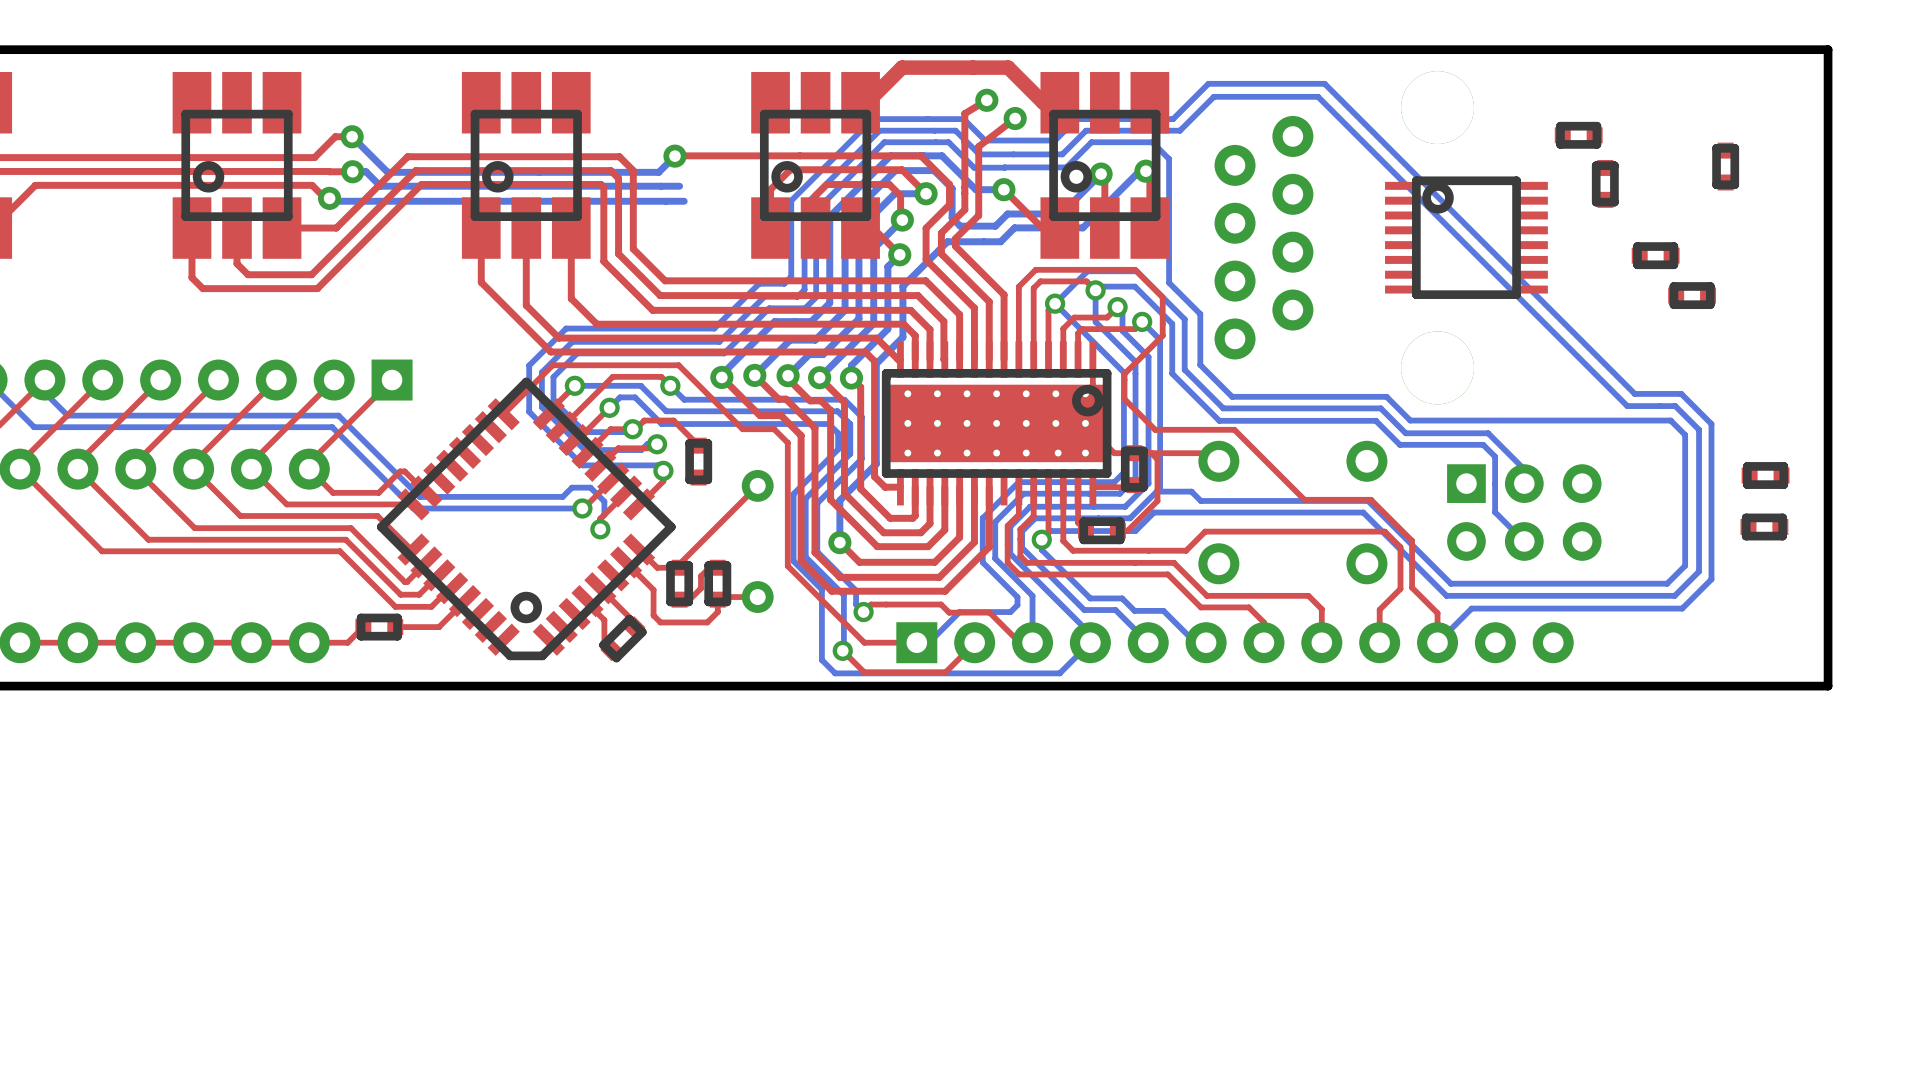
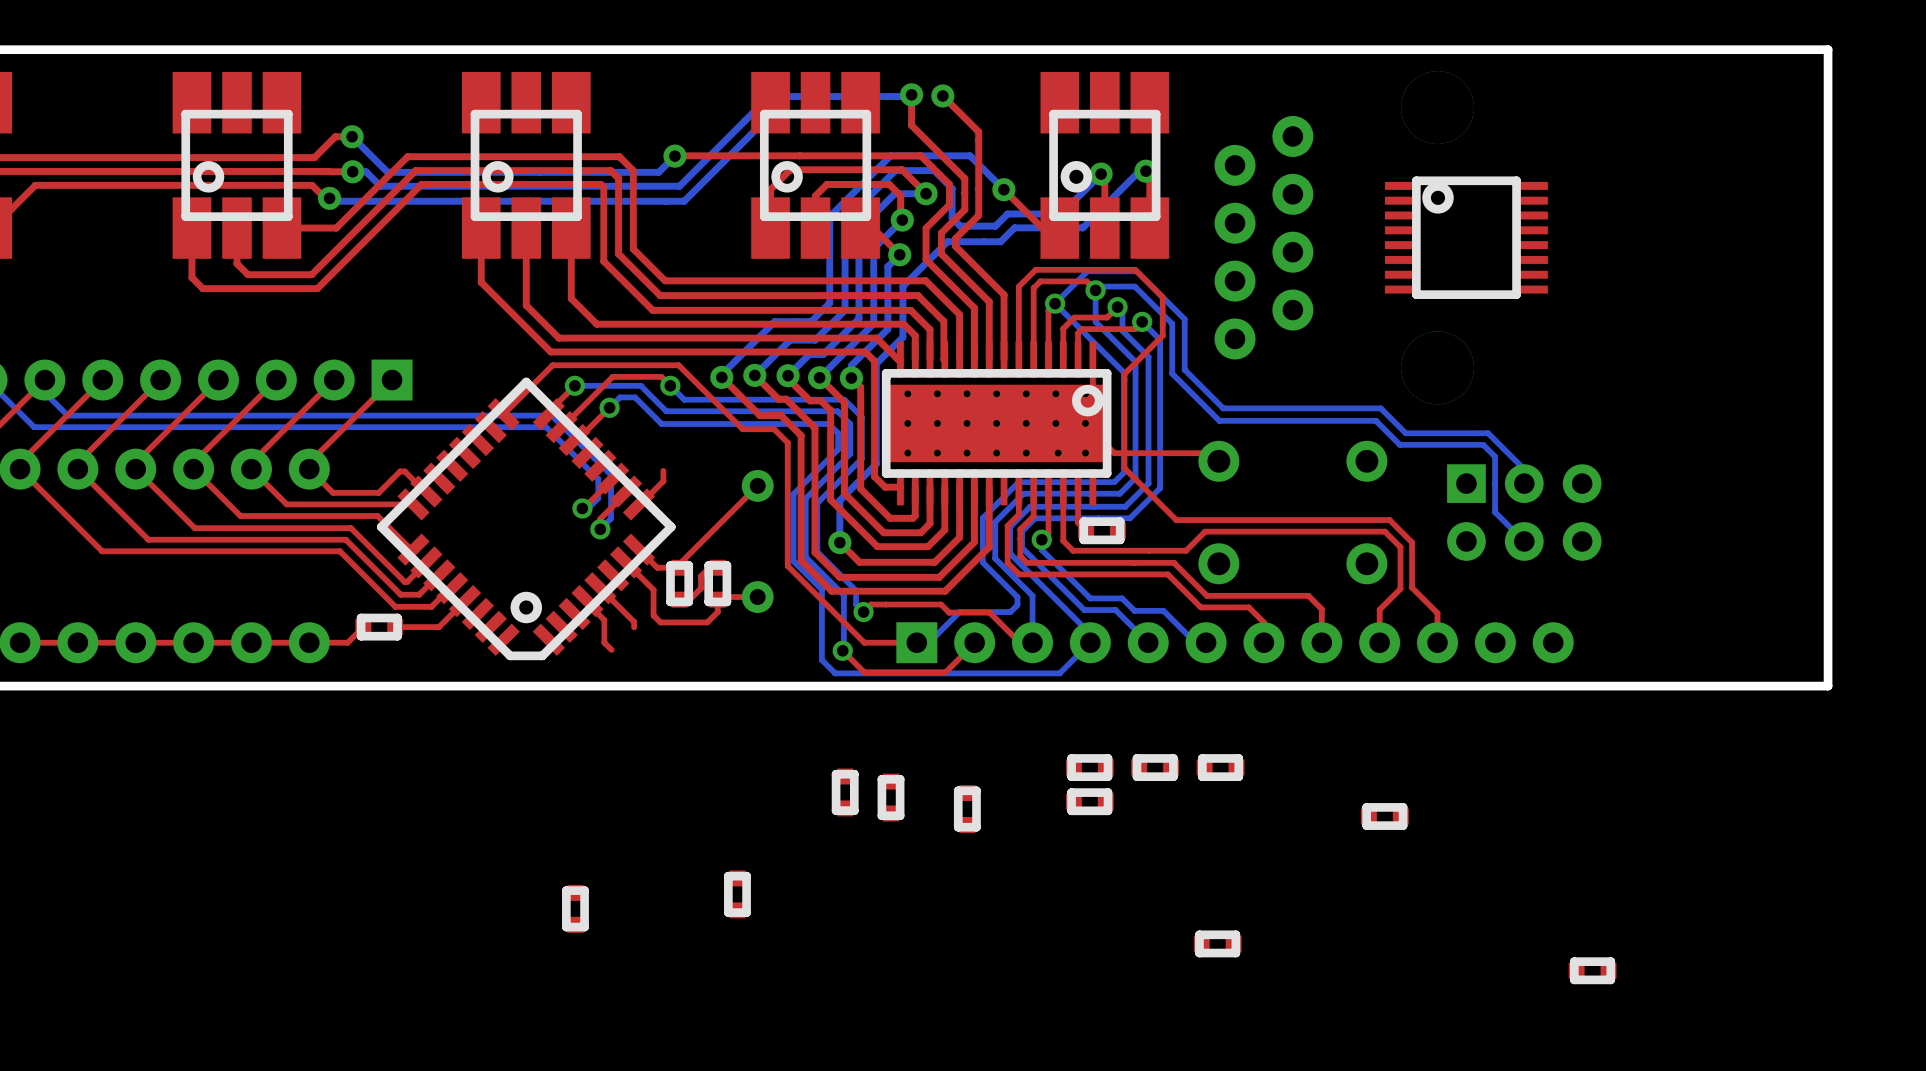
bottom track: none -> (911, 94) (909, 96) (769, 96) (679, 186)
via: none -> (911, 94)
via: none -> (942, 95)
top track: (986, 100) (964, 113) (964, 178) -> (911, 94) (911, 125) (964, 178)
via: (986, 100) -> none
top track: (860, 102) (866, 102) (902, 67) (1008, 67) (1043, 102) (1059, 102) -> none
bottom track: none -> (767, 117) (684, 201)
top track: (1015, 118) (978, 146) -> (942, 95) (978, 131) (978, 146)
via: (1015, 118) -> none
part: (1578, 135) -> none
bottom track: (941, 155) (975, 189) (1003, 189) -> (941, 155) (970, 155) (1003, 189)
part: (1725, 166) -> none
bottom track: (1004, 167) (1066, 167) (1091, 142) (1152, 142) (1169, 159) (1169, 282) (1200, 314) (1200, 365) (1232, 396) (1386, 396) (1410, 420) (1670, 420) (1685, 435) (1685, 565) (1667, 583) (1450, 583) (1368, 500) (1200, 500) (1191, 491) (1156, 491) -> none
bottom track: (1004, 167) (974, 167) (948, 142) (884, 142) (816, 210) (816, 297) (805, 308) (769, 308) (724, 353) (577, 353) (553, 377) (553, 400) (584, 432) (629, 432) (632, 429) -> none
part: (1605, 183) -> none
part: (1655, 255) -> none
part: (1692, 295) -> none
top track: (1124, 399) (1155, 429) (1234, 429) (1304, 499) (1370, 499) (1412, 542) -> (1124, 399) (1124, 468) (1176, 520) (1389, 520) (1412, 542)
bottom track: (338, 415) (419, 496) (562, 496) (571, 487) (590, 487) (604, 501) (604, 514) (600, 518) (600, 529) -> (338, 415) (551, 415) (611, 474) (611, 518) (600, 529)
bottom track: (332, 427) (413, 508) (582, 508) -> (332, 427) (546, 427) (598, 479) (598, 498) (588, 508) (582, 508)
via: (632, 429) -> none
top track: (657, 444) (652, 448) (618, 448) (600, 465) -> none
bottom track: (657, 444) (647, 444) (641, 450) (584, 450) (541, 407) (541, 372) (572, 341) (719, 341) (764, 296) (797, 296) (804, 289) (804, 205) (879, 130) (955, 130) (979, 154) (1062, 154) (1086, 130) (1180, 130) (1213, 96) (1318, 96) (1627, 406) (1675, 406) (1699, 429) (1699, 571) (1674, 595) (1446, 595) (1363, 512) (1154, 512) (1135, 531) (1050, 531) (1041, 539) -> none
via: (657, 444) -> none
top track: (698, 445) (673, 420) (644, 420) (635, 429) (610, 429) (587, 452) -> none
top track: (1151, 453) (1157, 459) (1157, 500) (1127, 530) (1117, 530) -> none
part: (698, 461) -> none
part: (1134, 469) -> none
bottom track: (663, 470) (657, 465) (582, 465) (529, 411) (529, 365) (566, 328) (714, 328) (759, 283) (784, 283) (791, 276) (791, 200) (872, 119) (963, 119) (985, 140) (1055, 140) (1076, 119) (1173, 119) (1208, 83) (1324, 83) (1634, 393) (1681, 393) (1711, 424) (1711, 579) (1682, 608) (1471, 608) (1437, 642) -> none
via: (663, 470) -> none
part: (1765, 475) -> none
top track: (1134, 485) (1132, 487) (1092, 487) -> none
part: (1764, 527) -> none
part: (622, 638) -> none
part: none -> (1089, 767)
part: none -> (1155, 767)
part: none -> (1220, 767)
part: none -> (845, 792)
part: none -> (891, 797)
part: none -> (1089, 801)
part: none -> (967, 808)
part: none -> (1384, 816)
part: none -> (737, 894)
part: none -> (575, 908)
part: none -> (1217, 943)
part: none -> (1592, 970)

